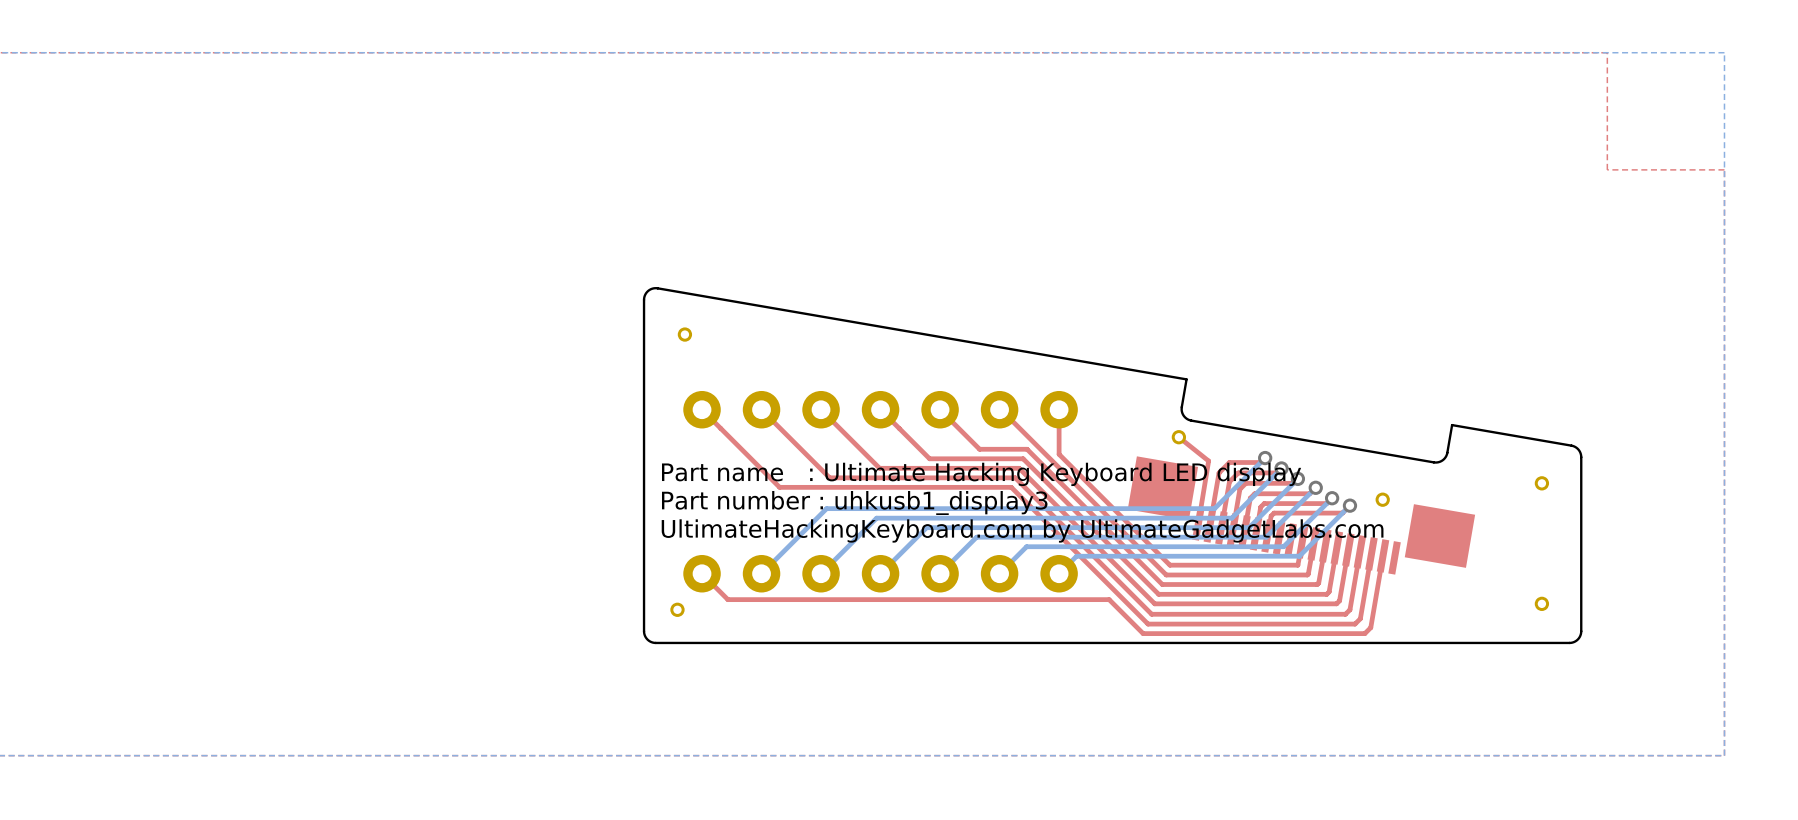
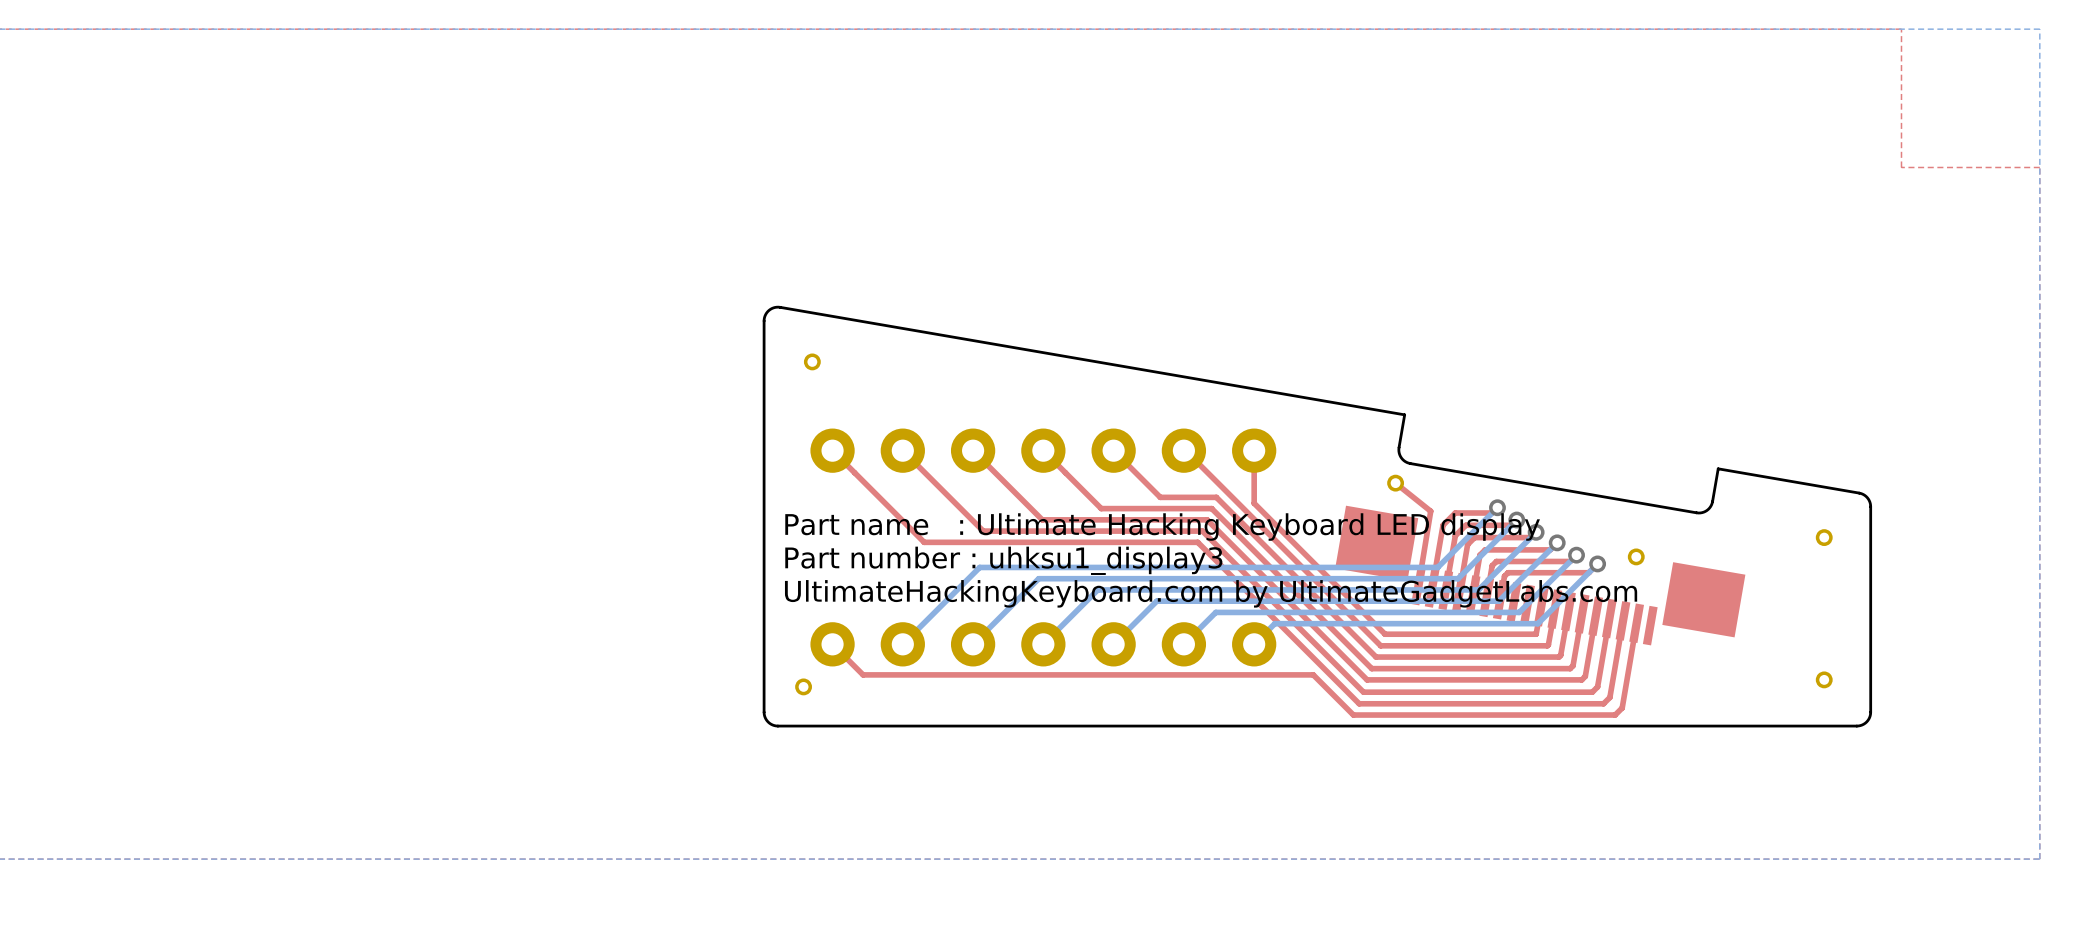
text: Part number : uhkusb1_display3 (854, 503) -> Part number : uhksu1_display3 (1003, 560)

